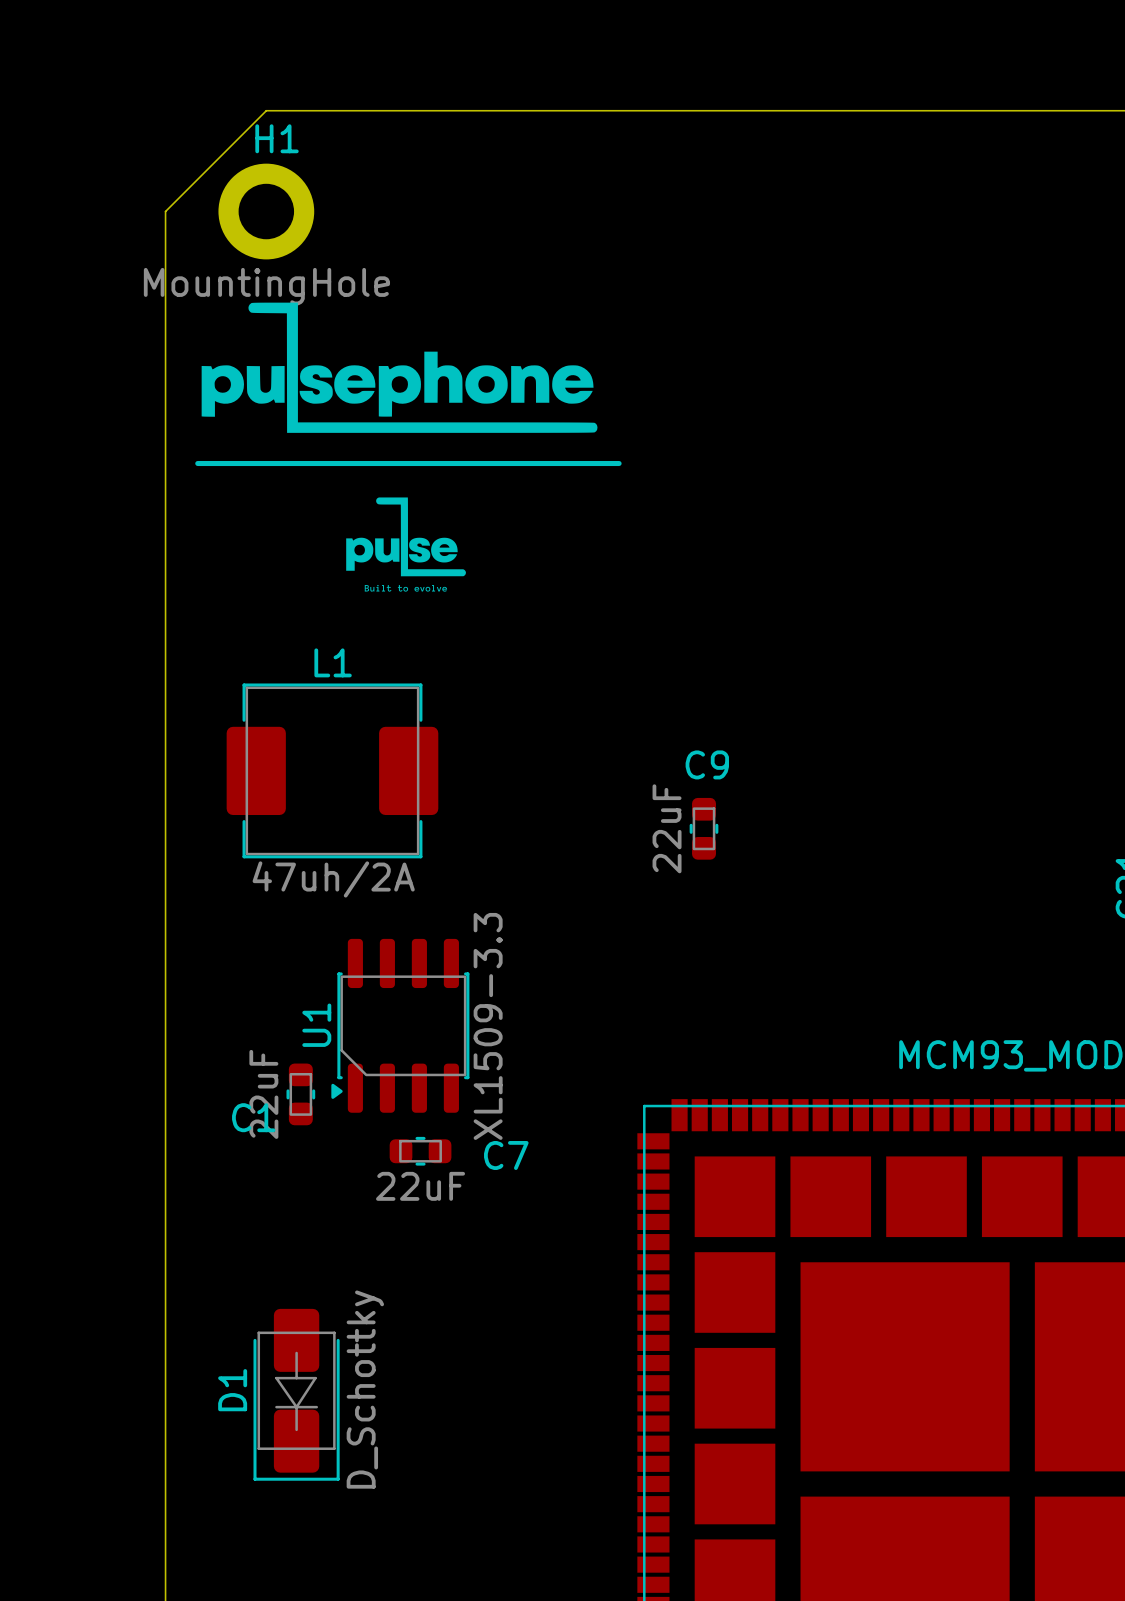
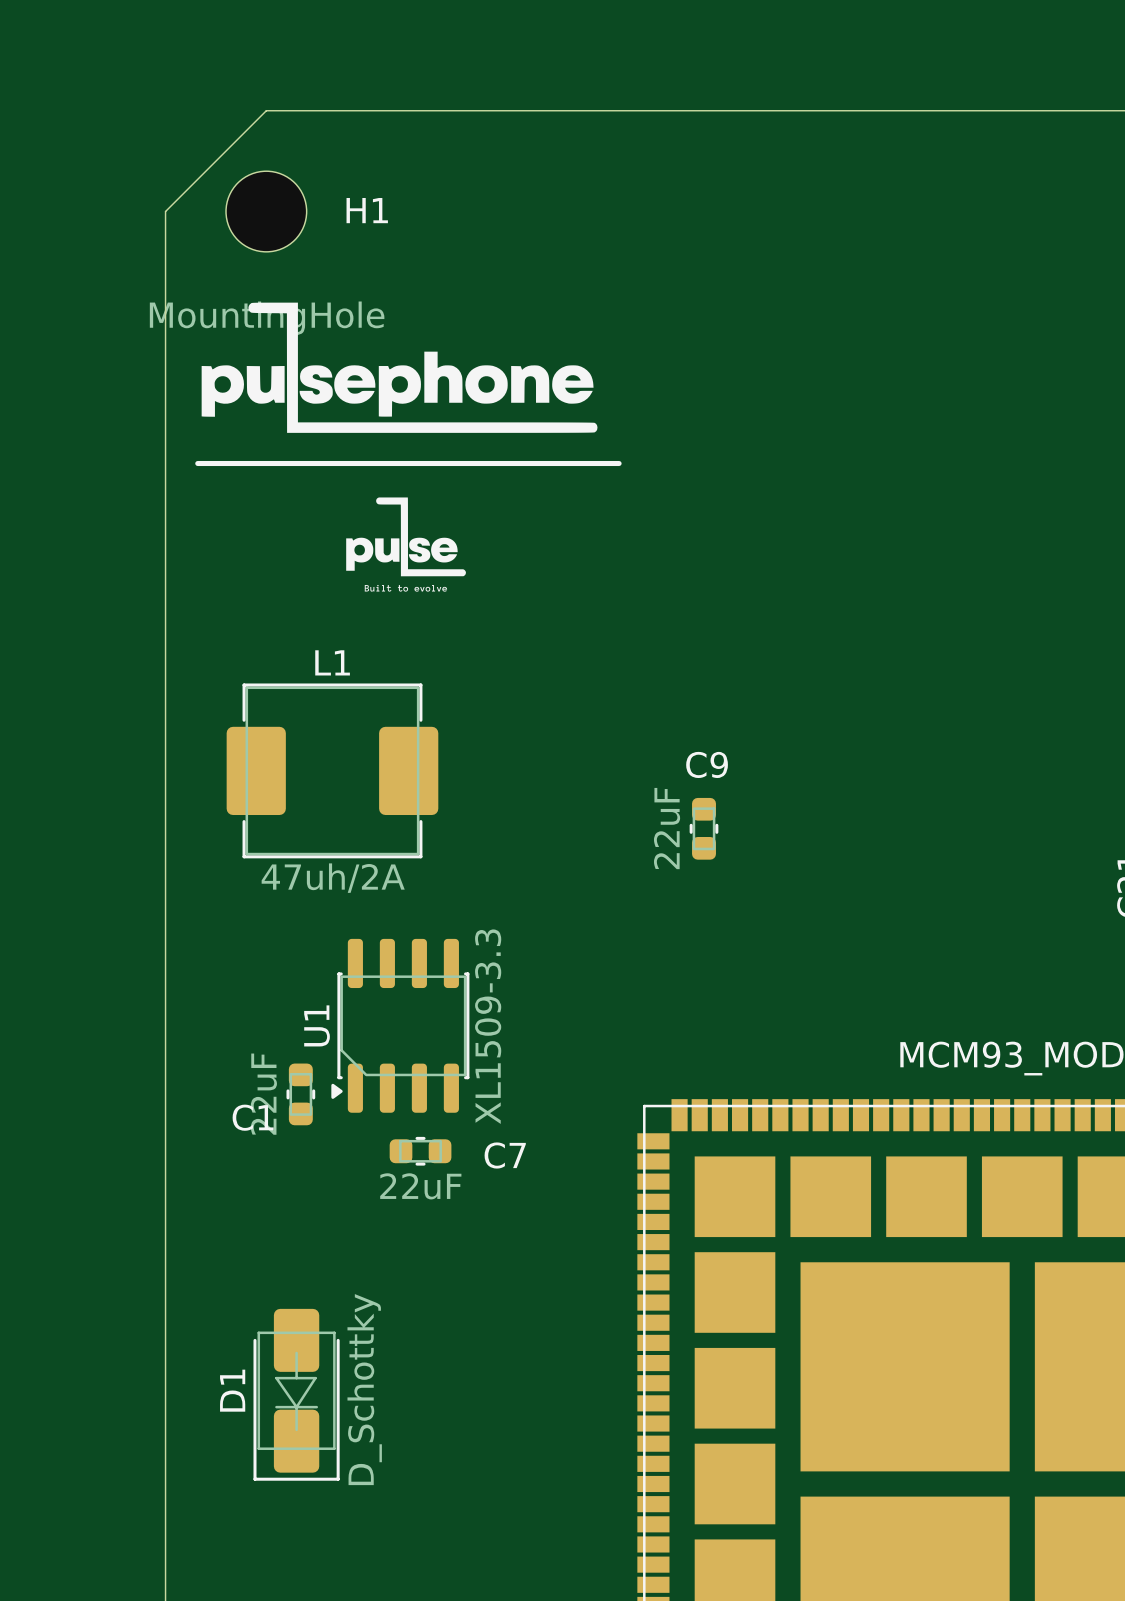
H1 name position: H1 (277, 138) -> H1 (367, 210)
H1 footprint: [218, 163, 315, 260] -> [226, 171, 307, 252]

